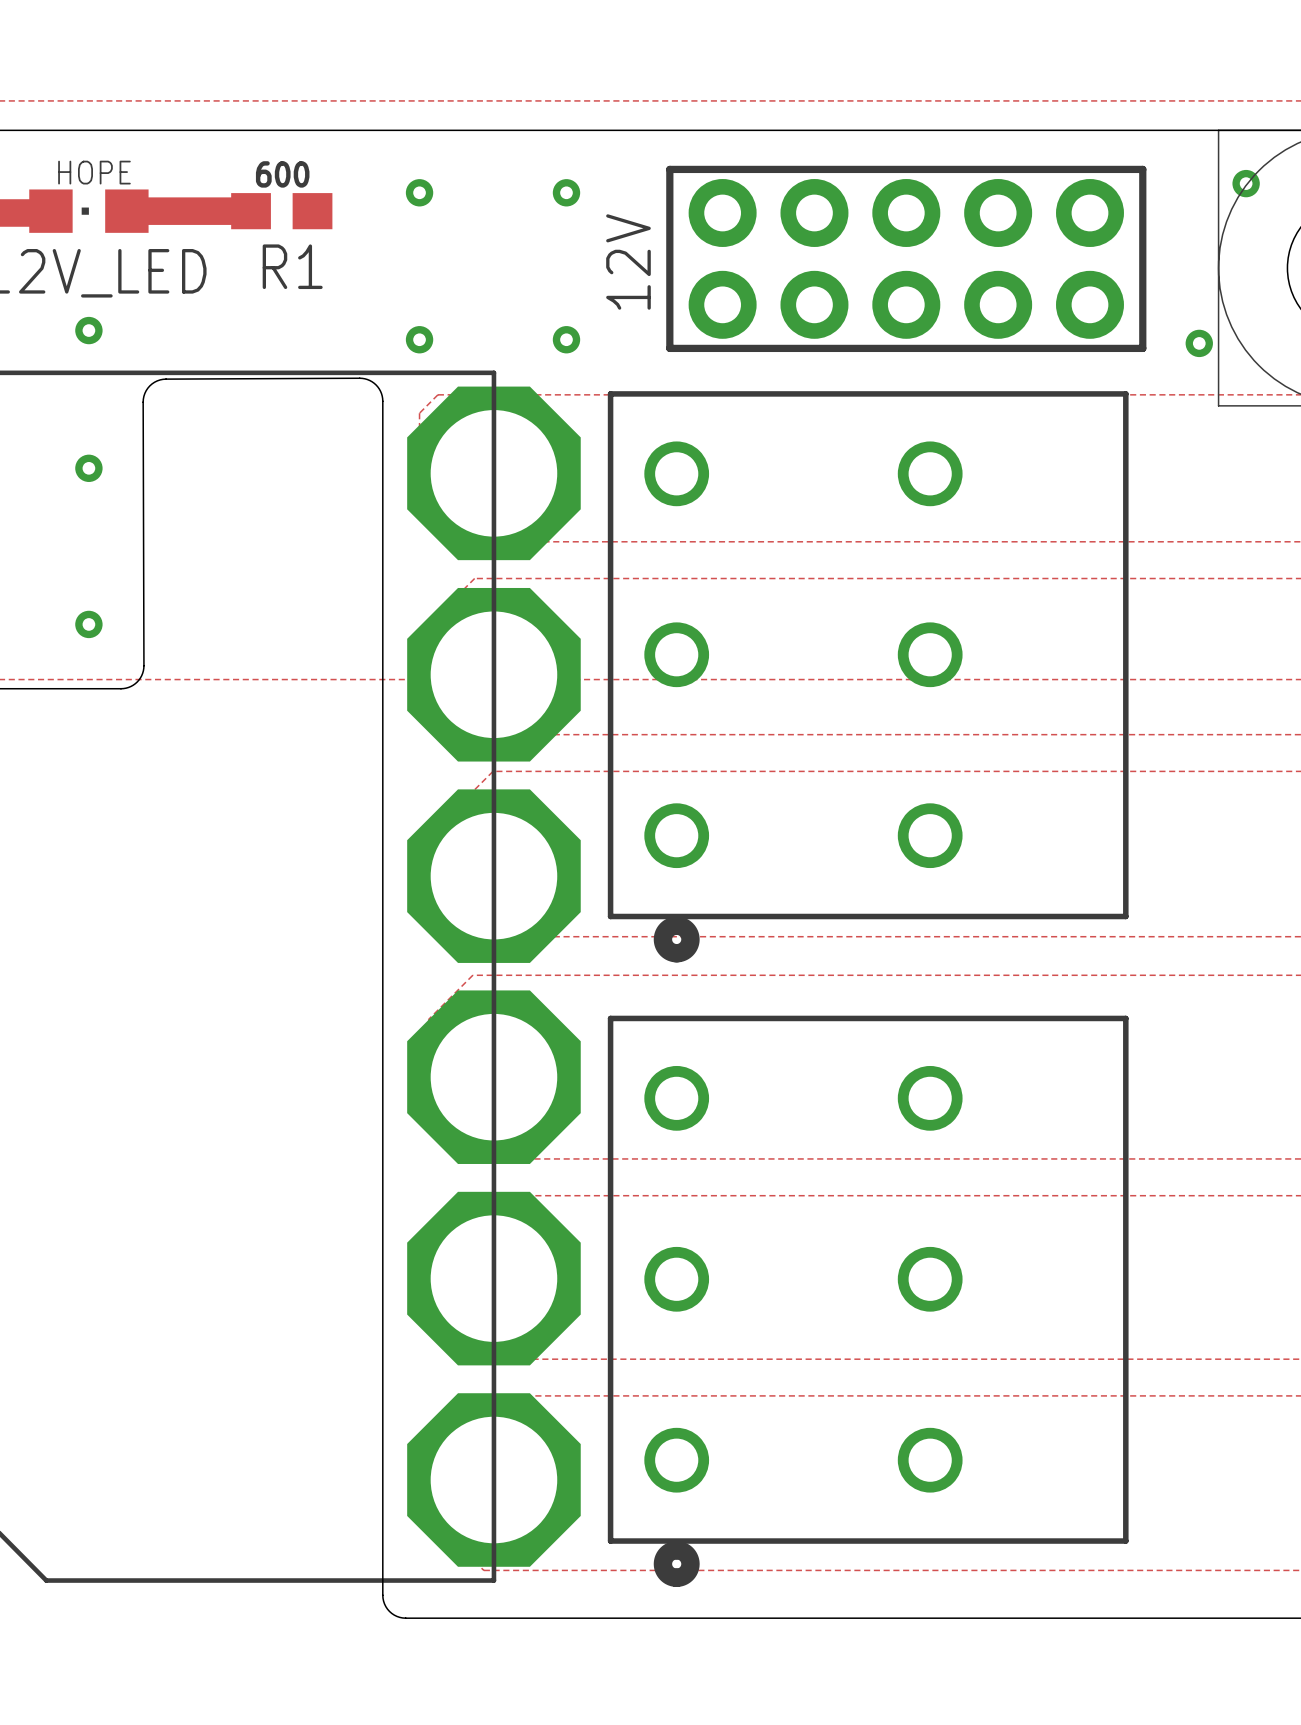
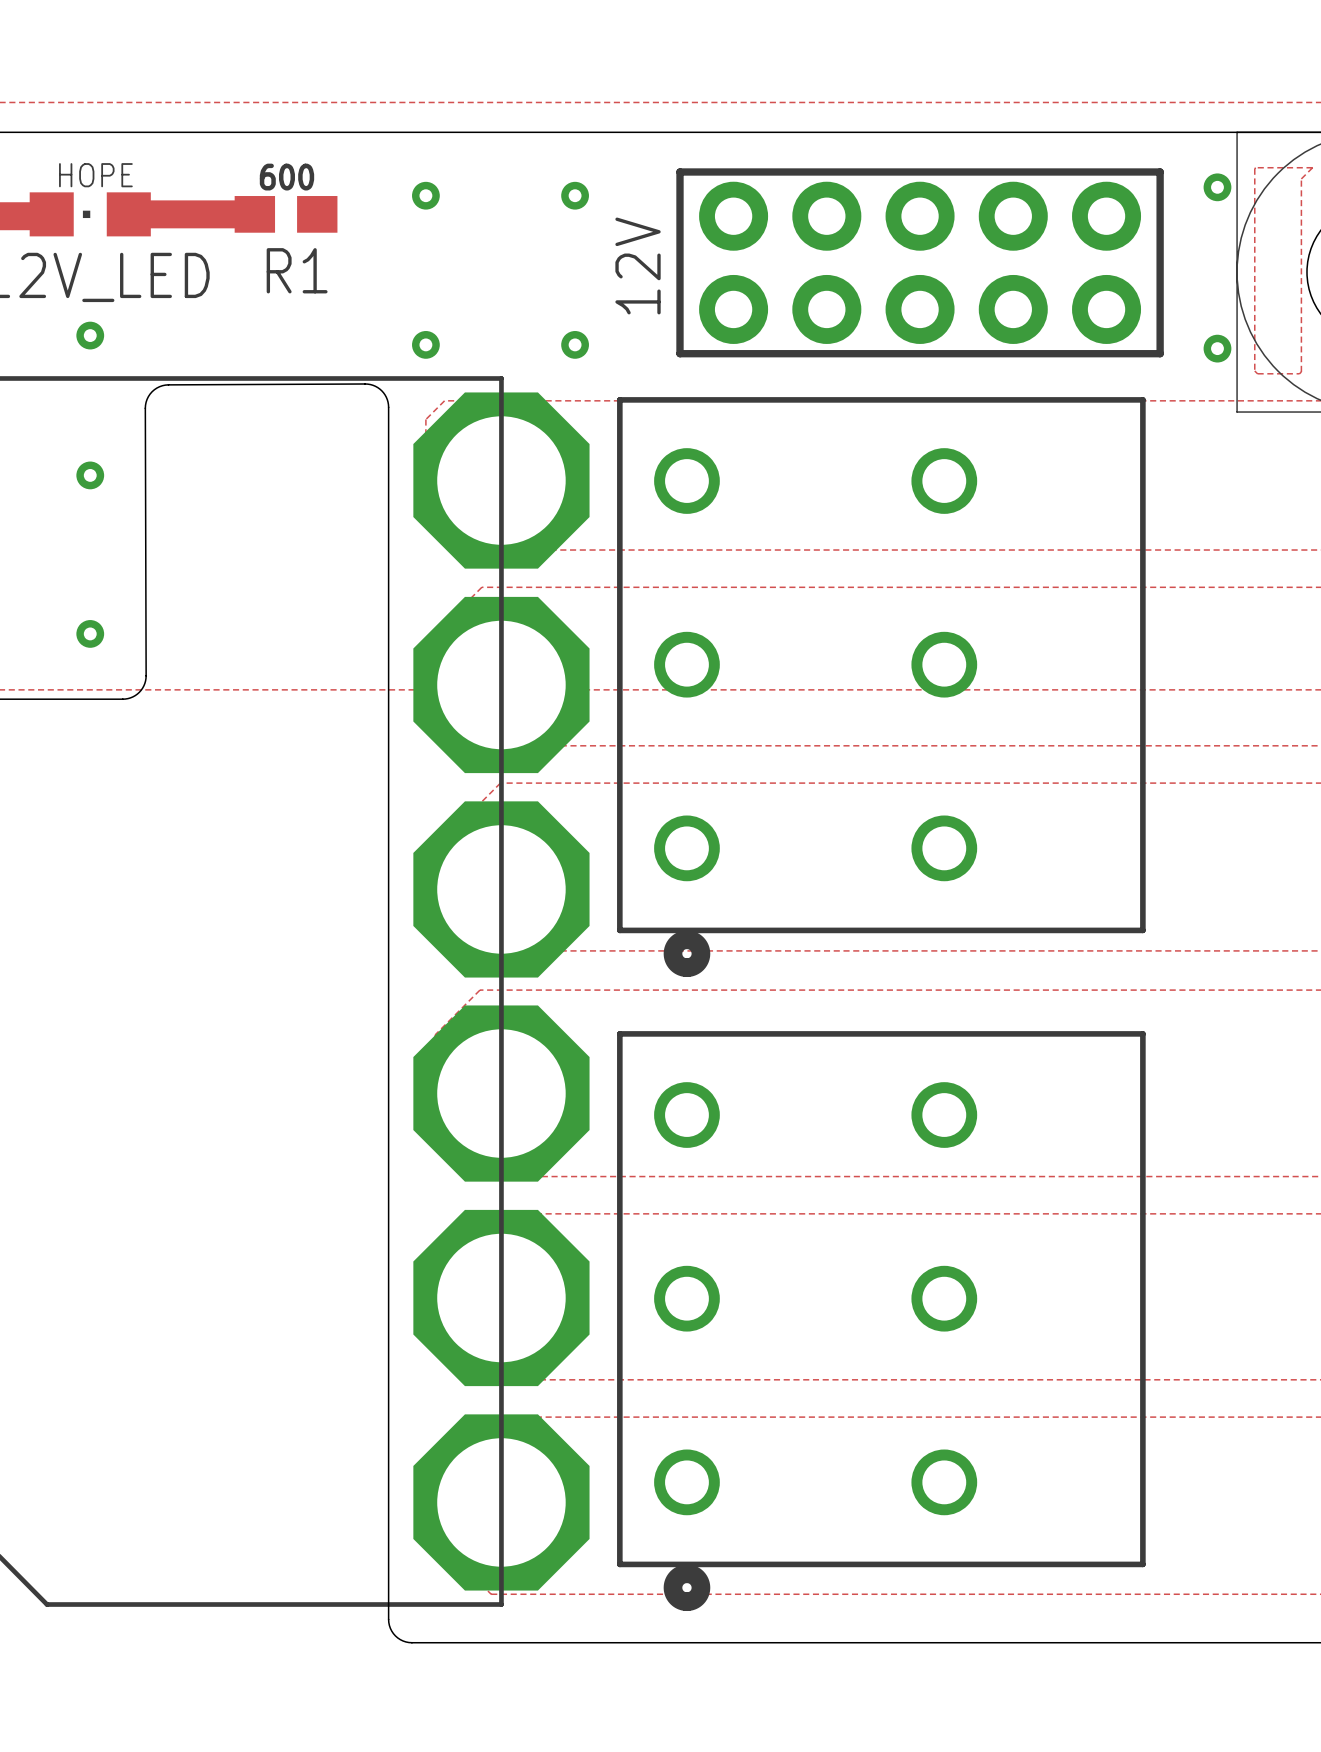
zone outline: none -> (1255, 167) (1312, 167) (1301, 178) (1301, 371) (1299, 373) (1257, 373) (1254, 370) (1255, 167)
via position: (1246, 183) -> (1217, 187)

